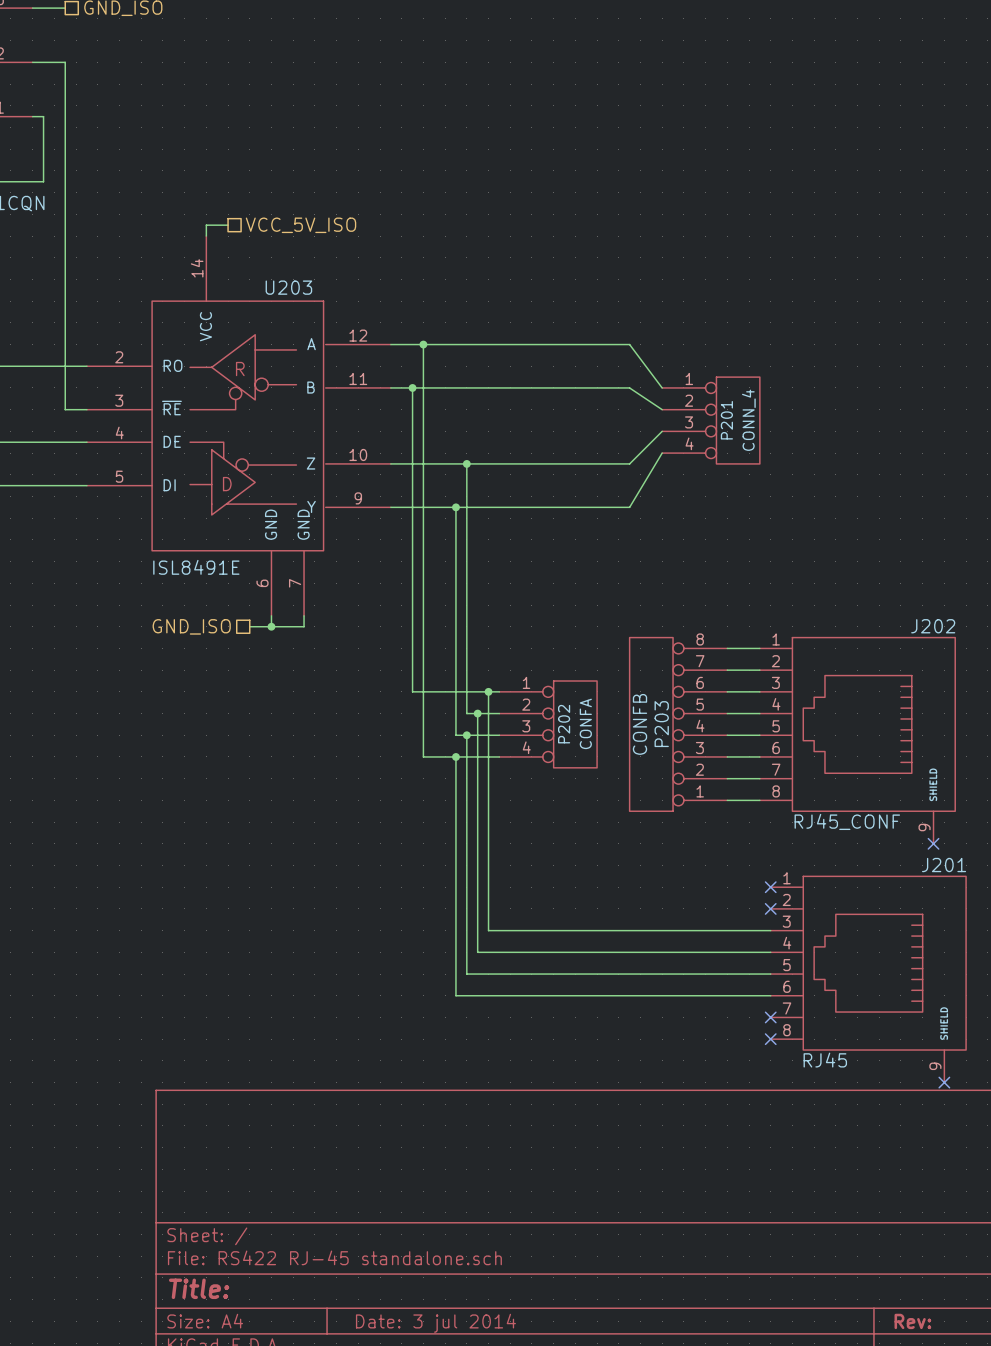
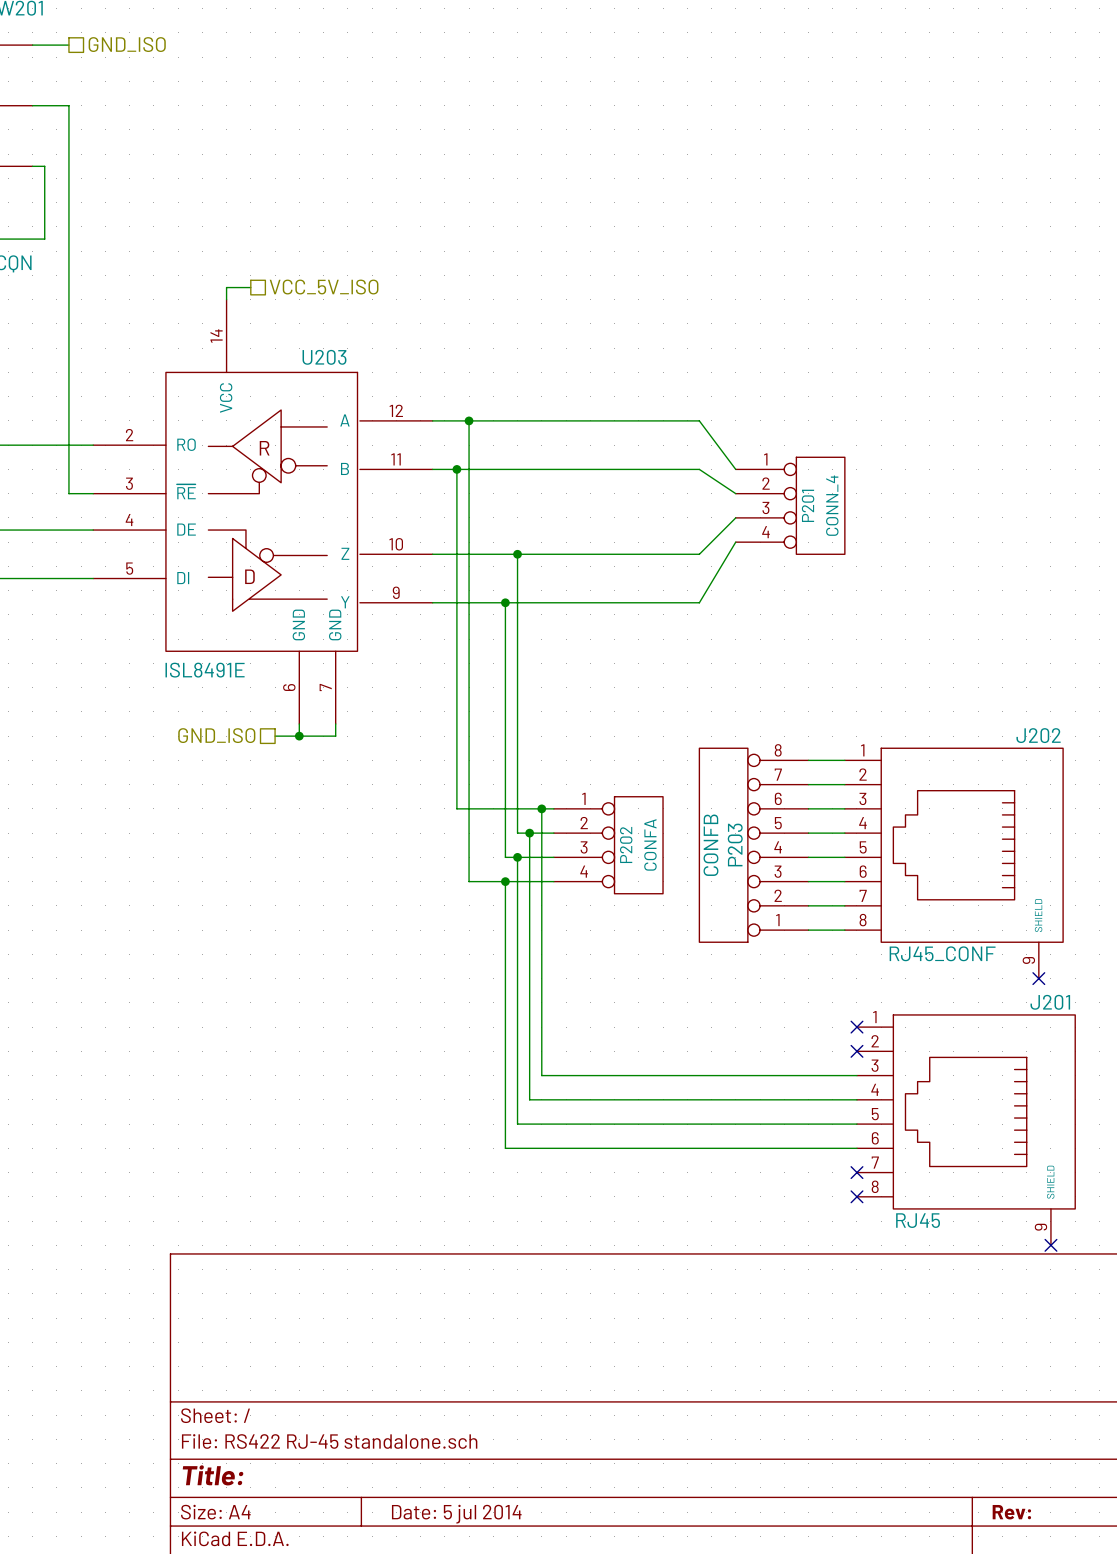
title block: Date: 3 jul 2014 (435, 1323) -> Date: 5 jul 2014 (456, 1514)

